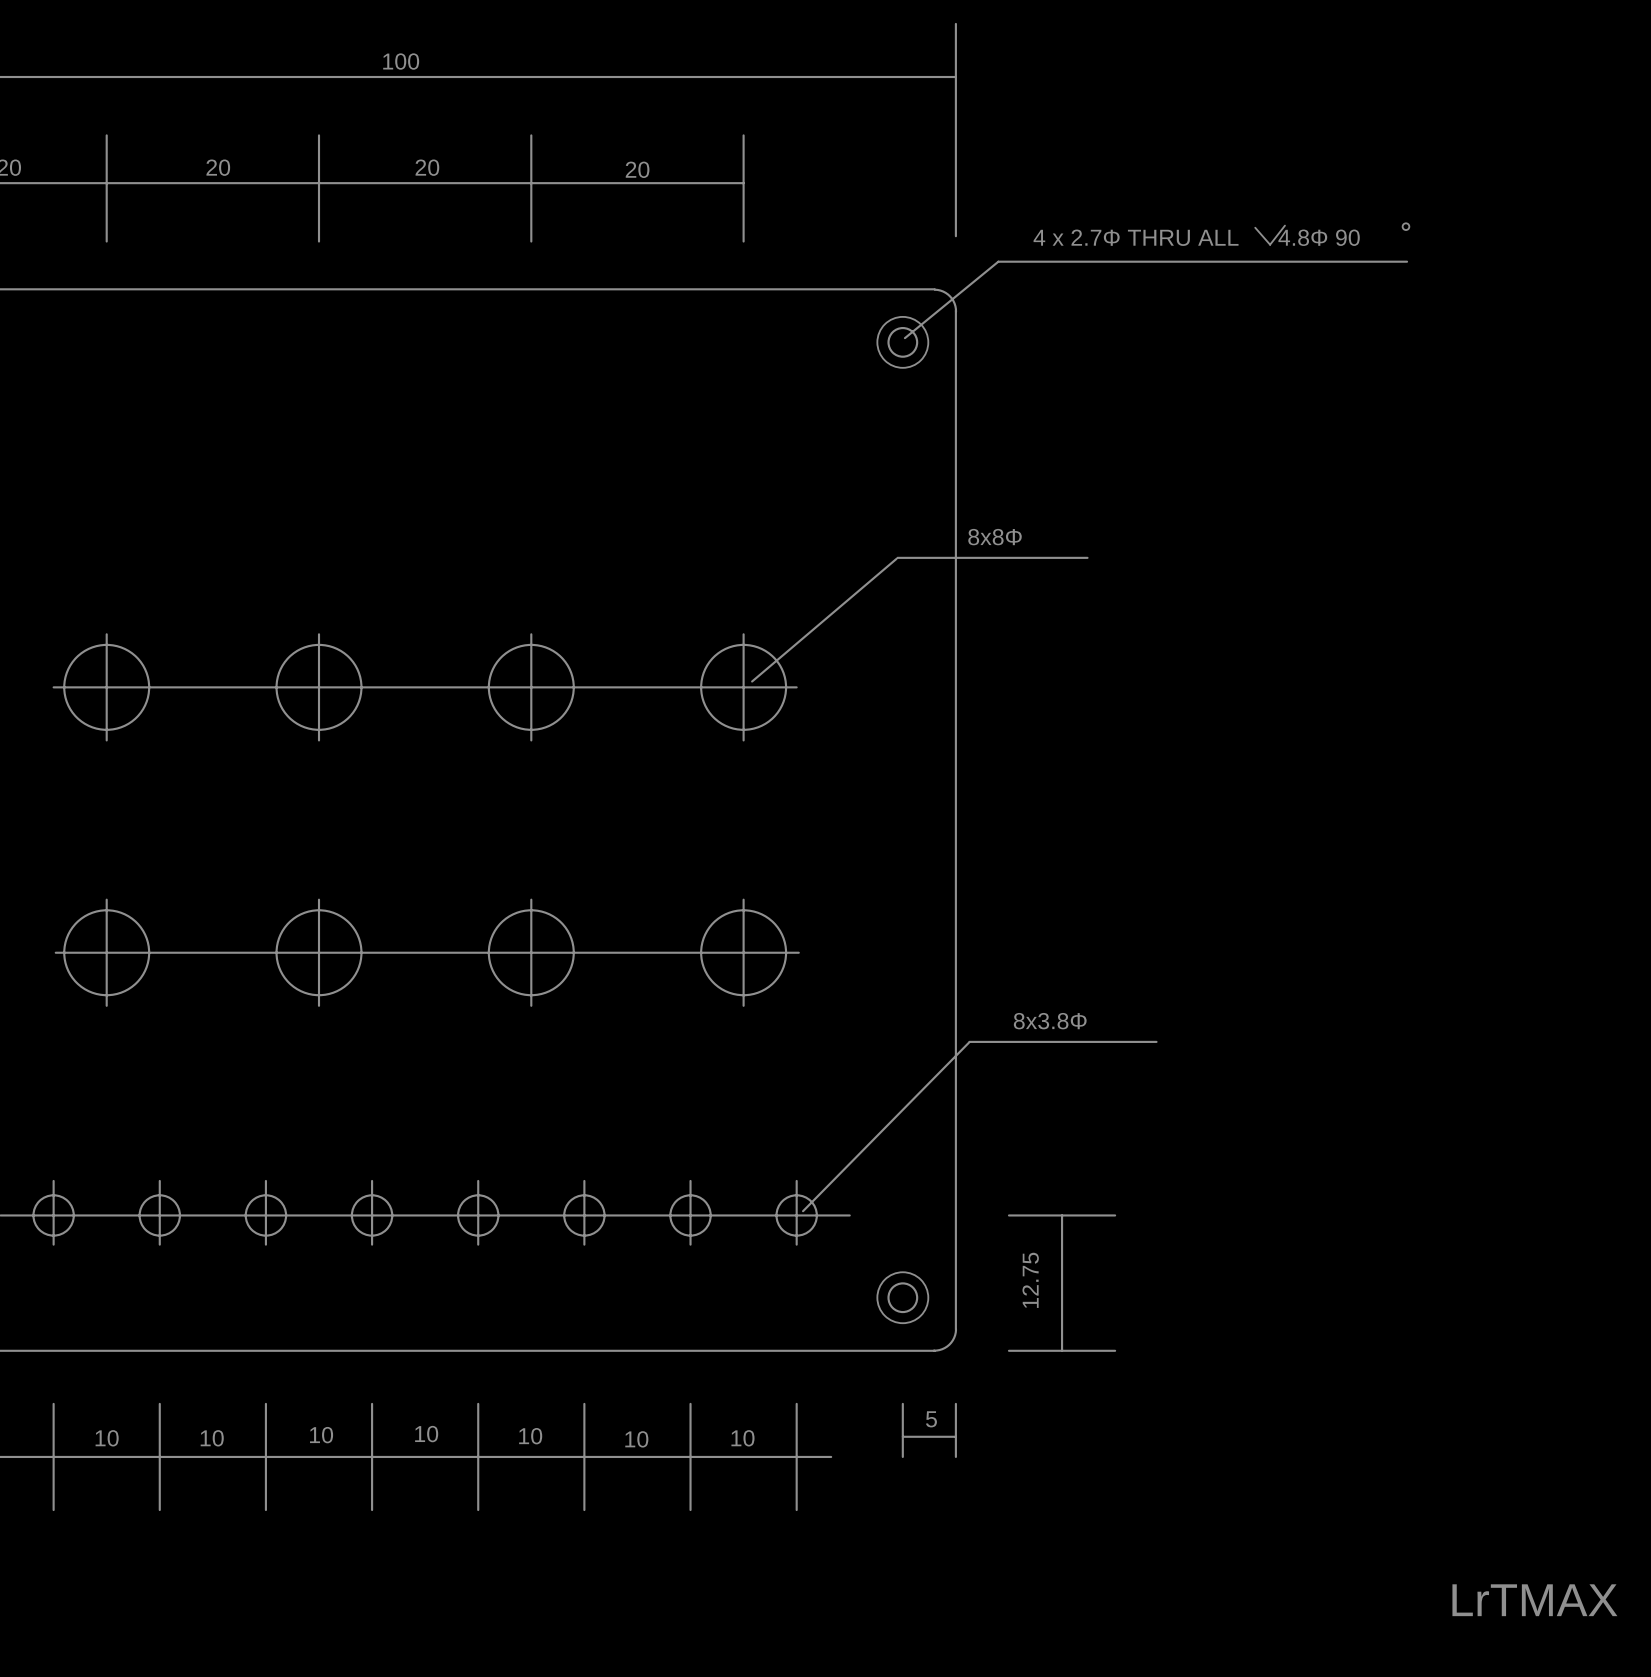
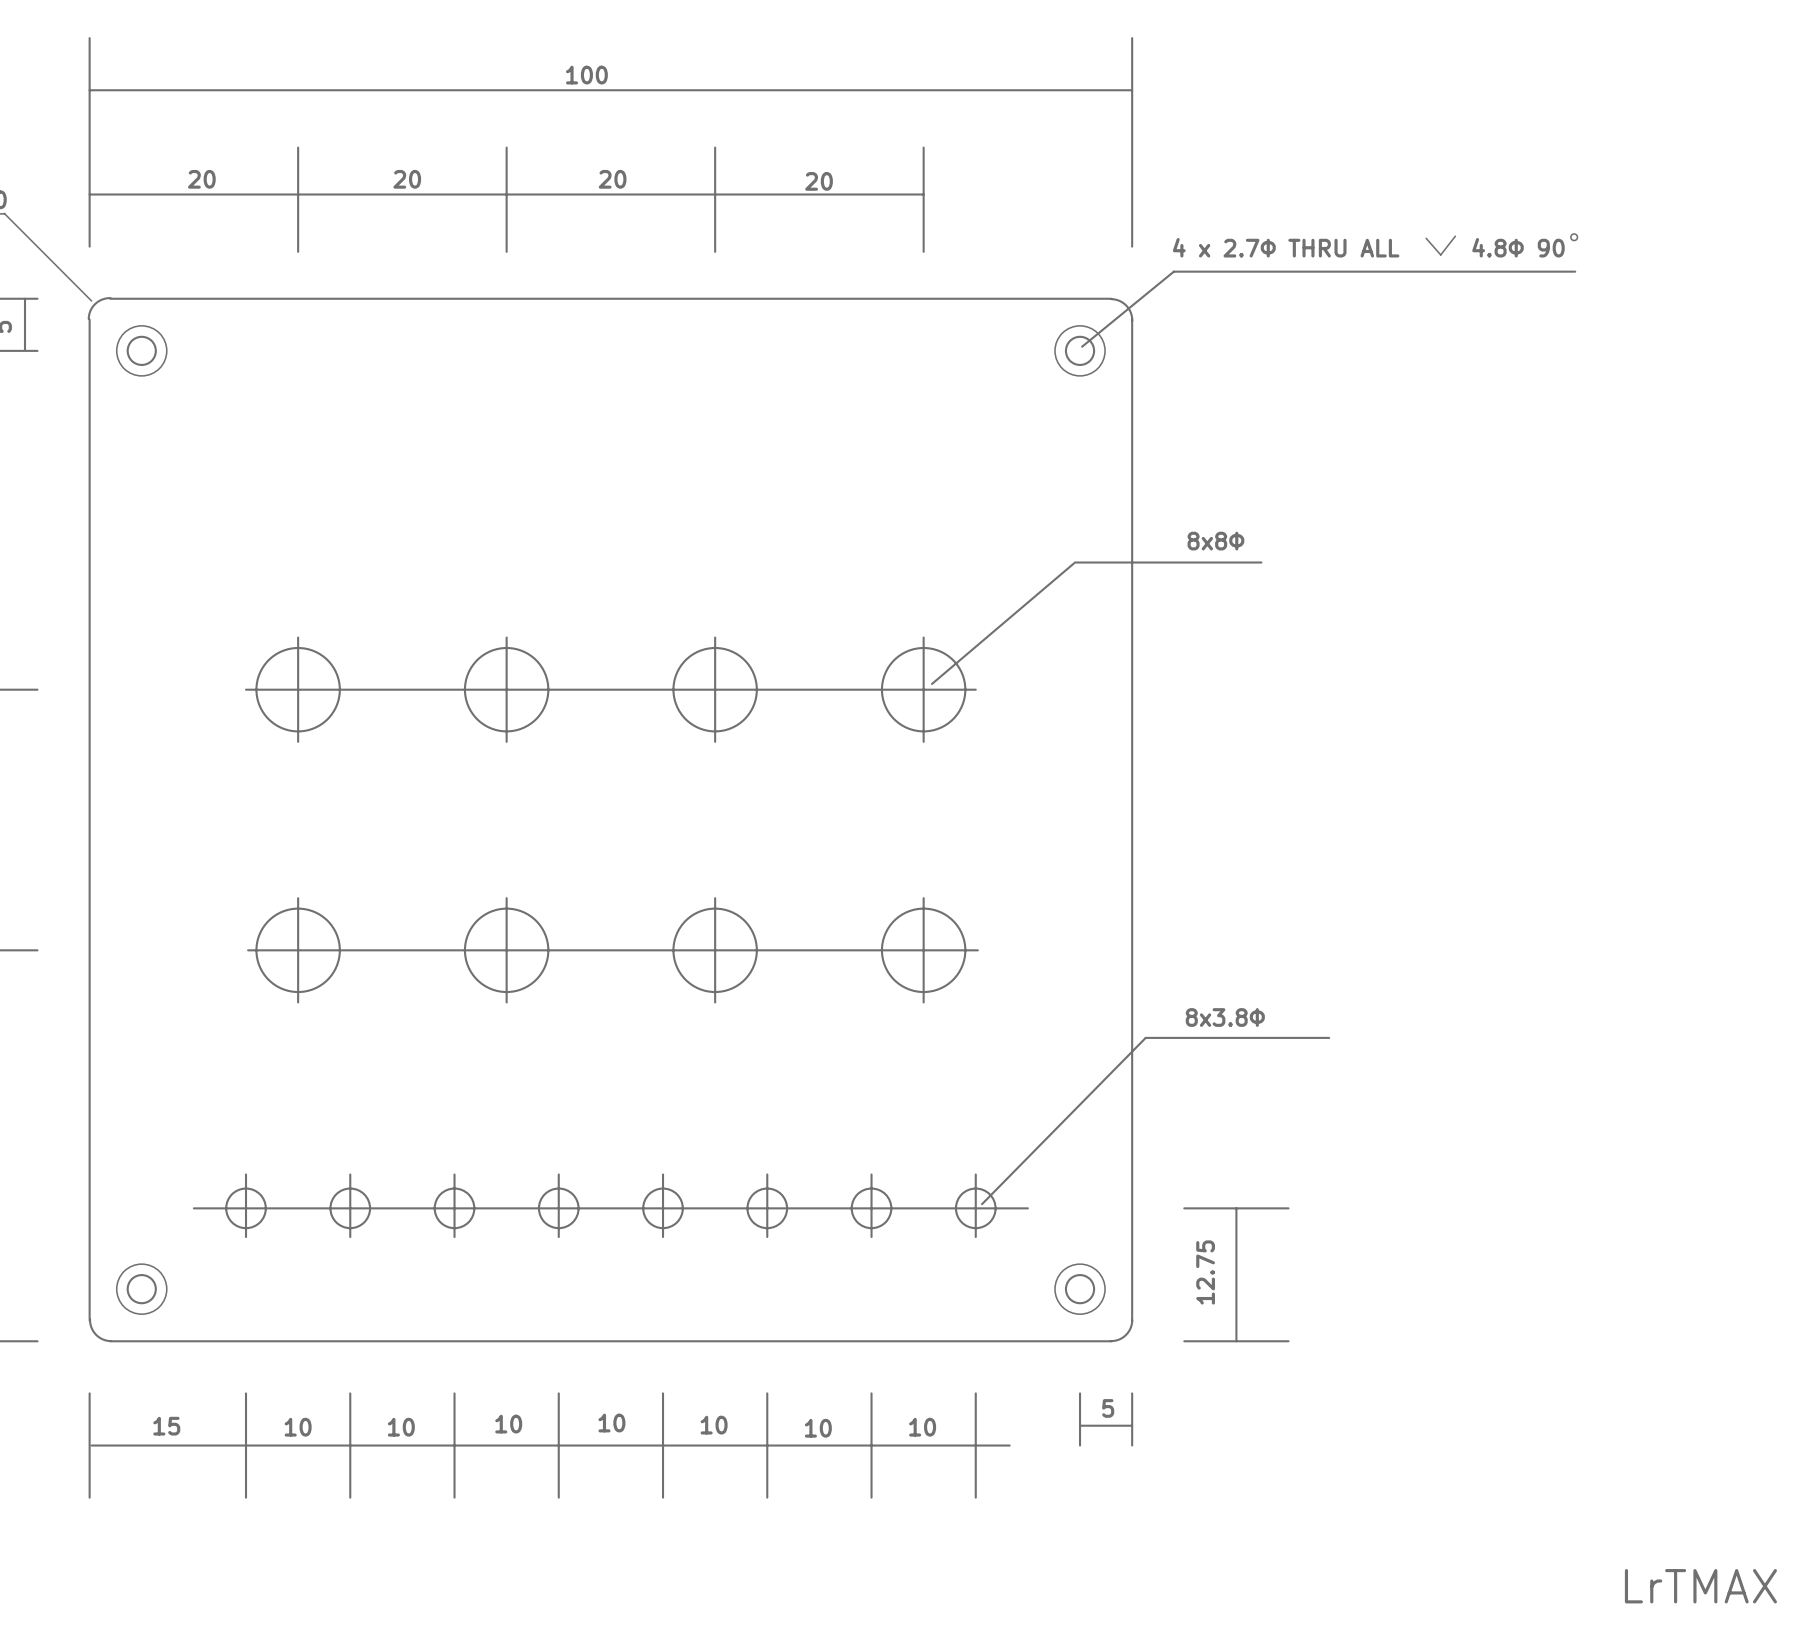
text position: 8x8Φ (995, 537) -> 8x8Φ (1215, 541)

